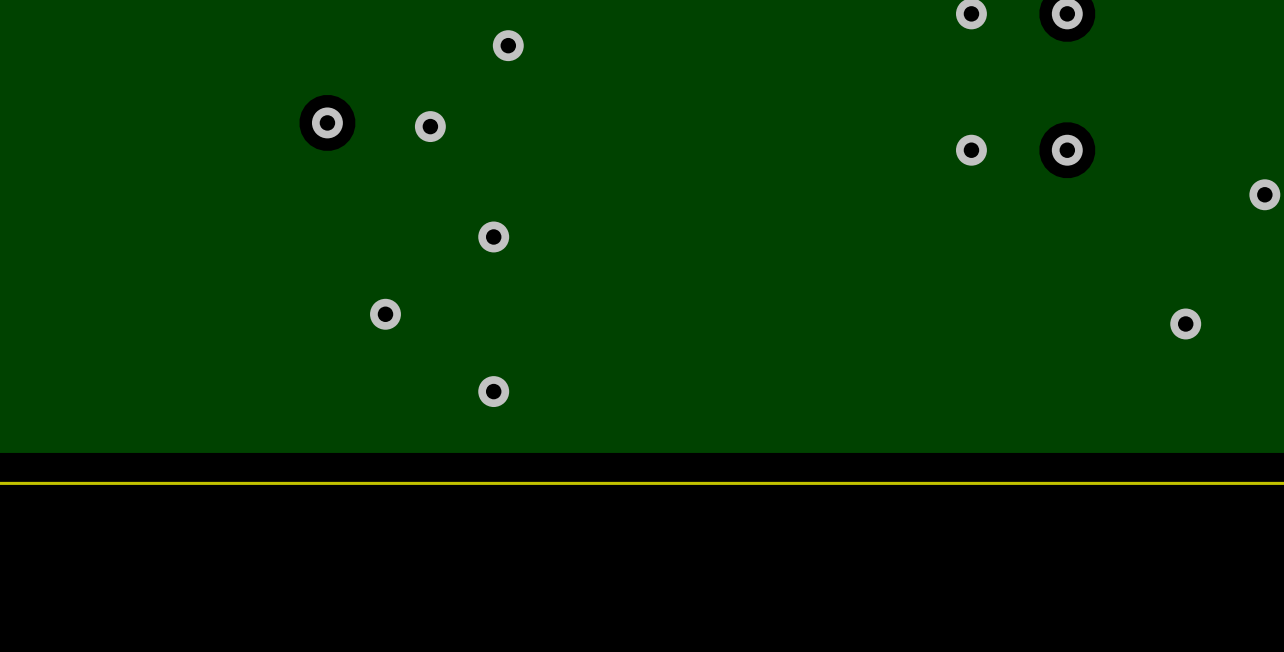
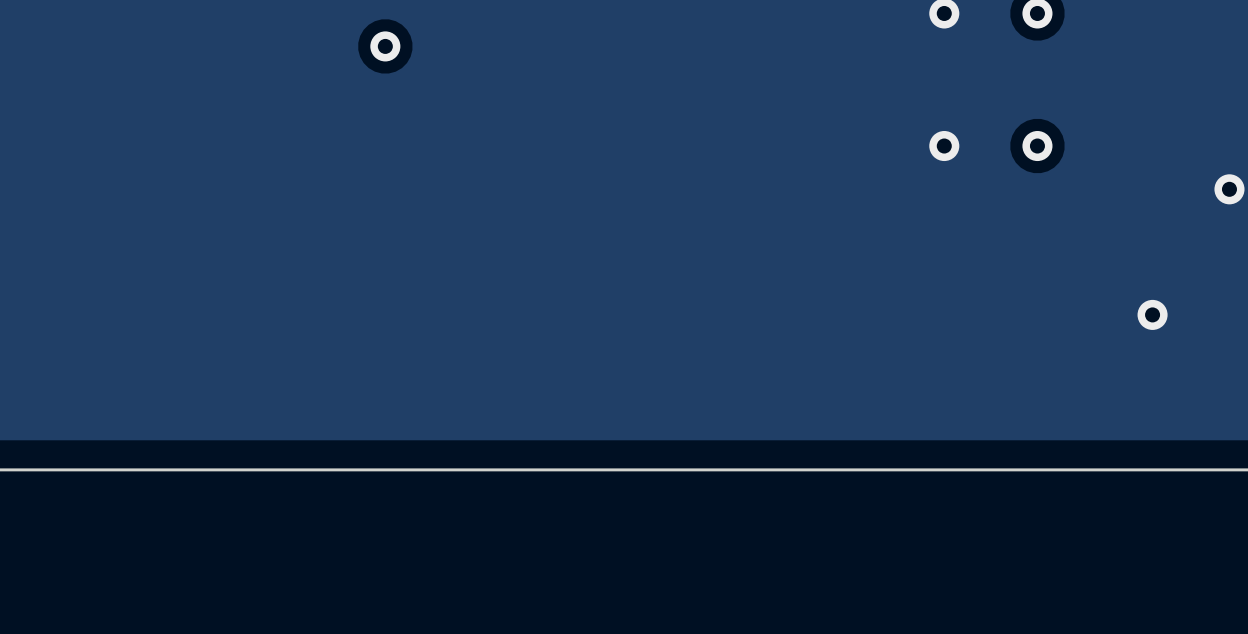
via: (508, 45) -> none
via: none -> (385, 46)
via: (327, 122) -> none
via: (430, 126) -> none
via: (493, 236) -> none
via: (385, 314) -> none
via: (493, 391) -> none

